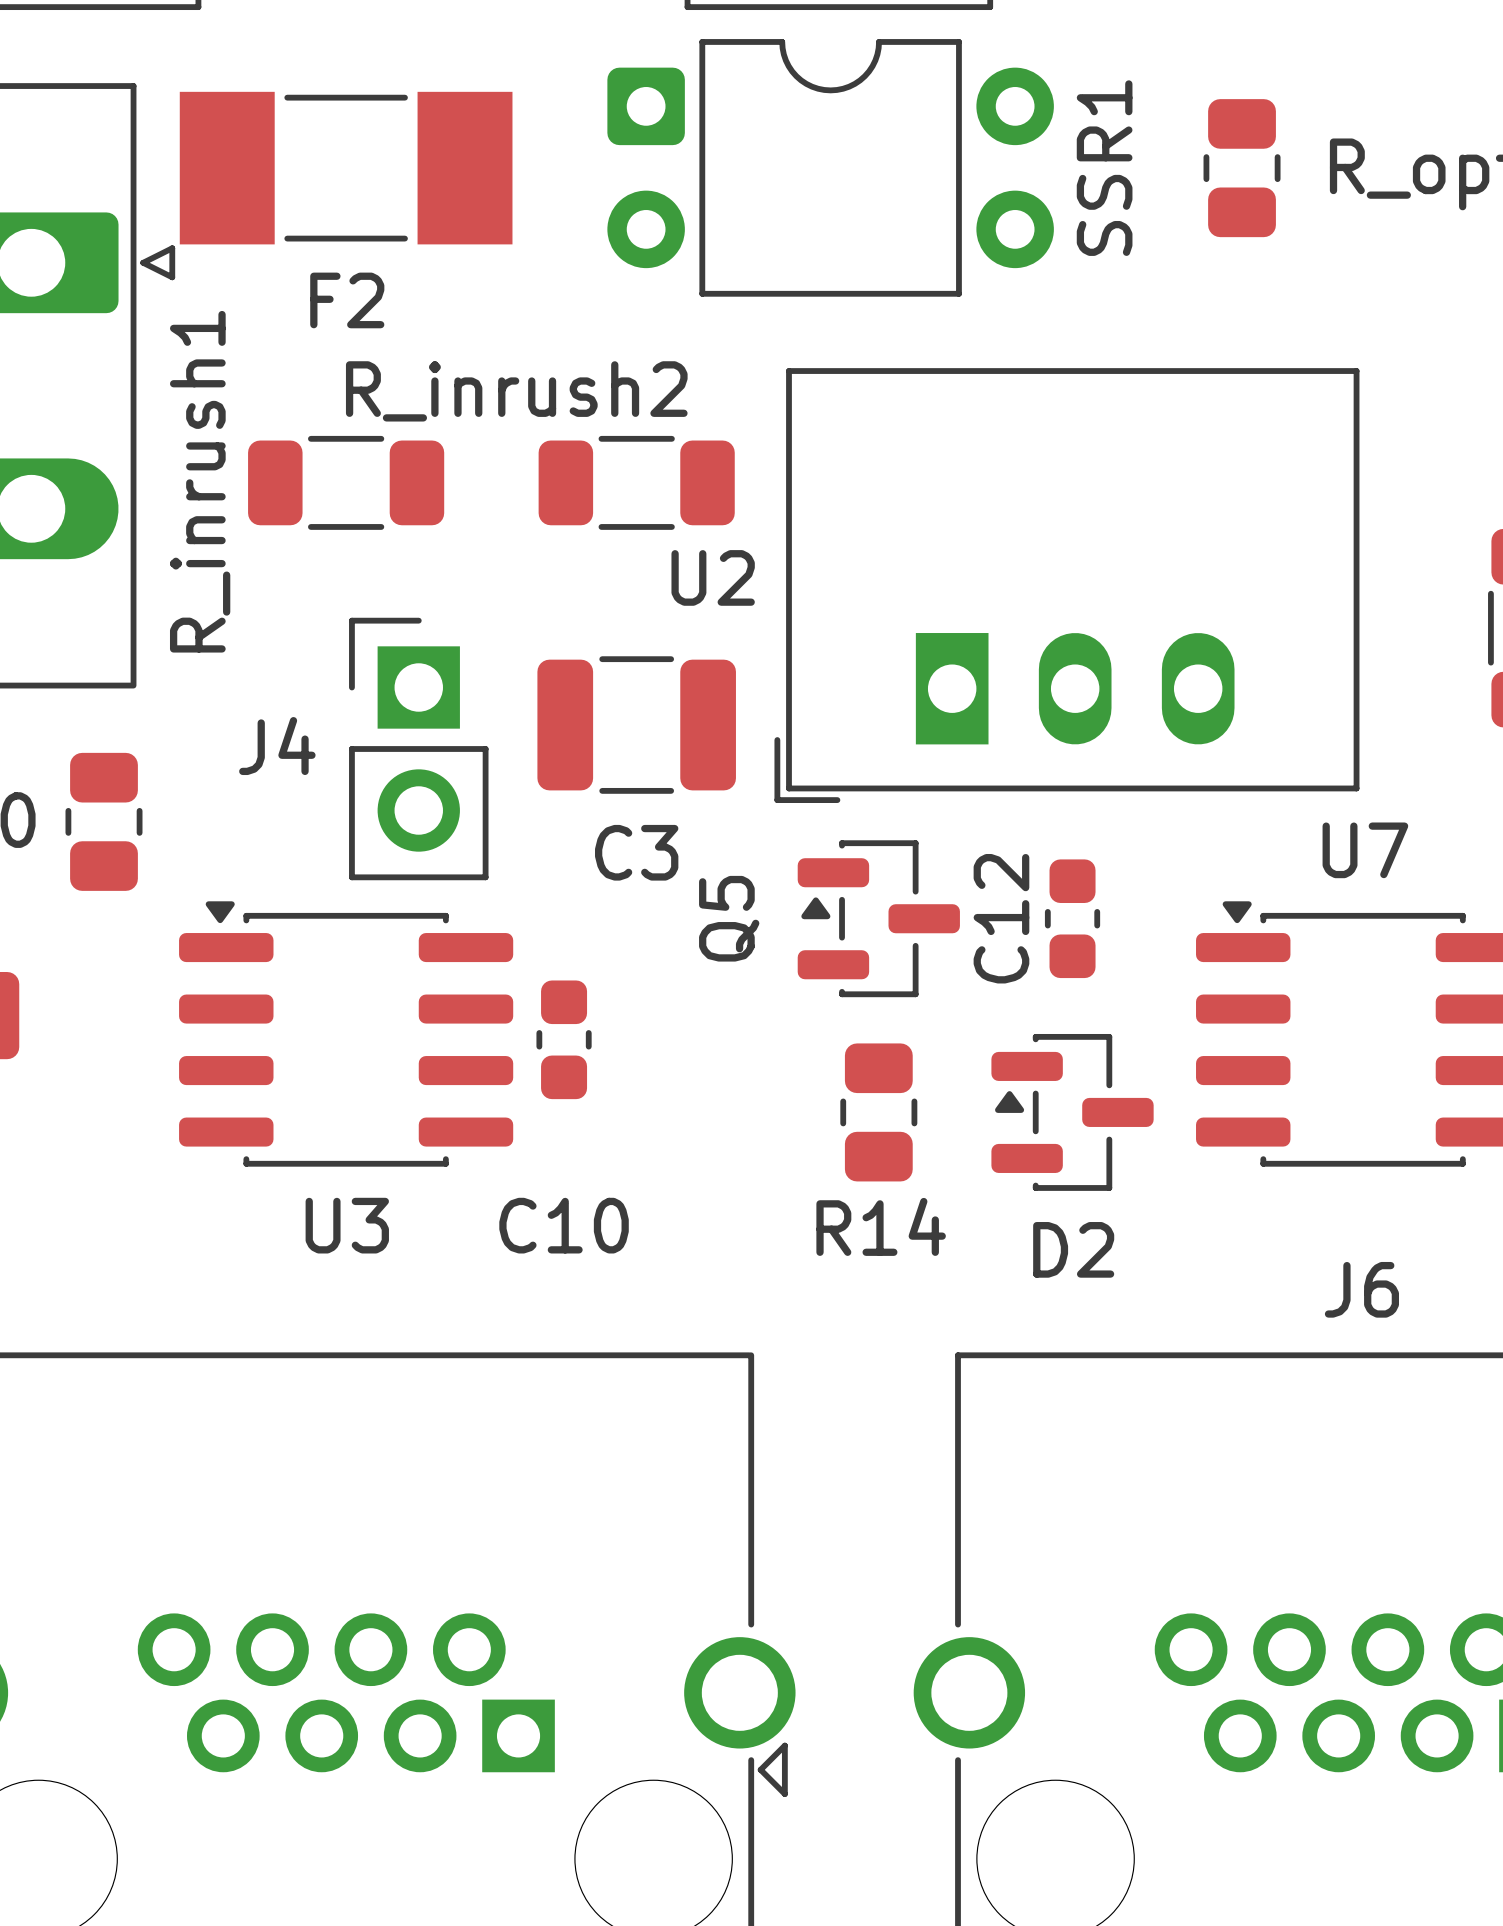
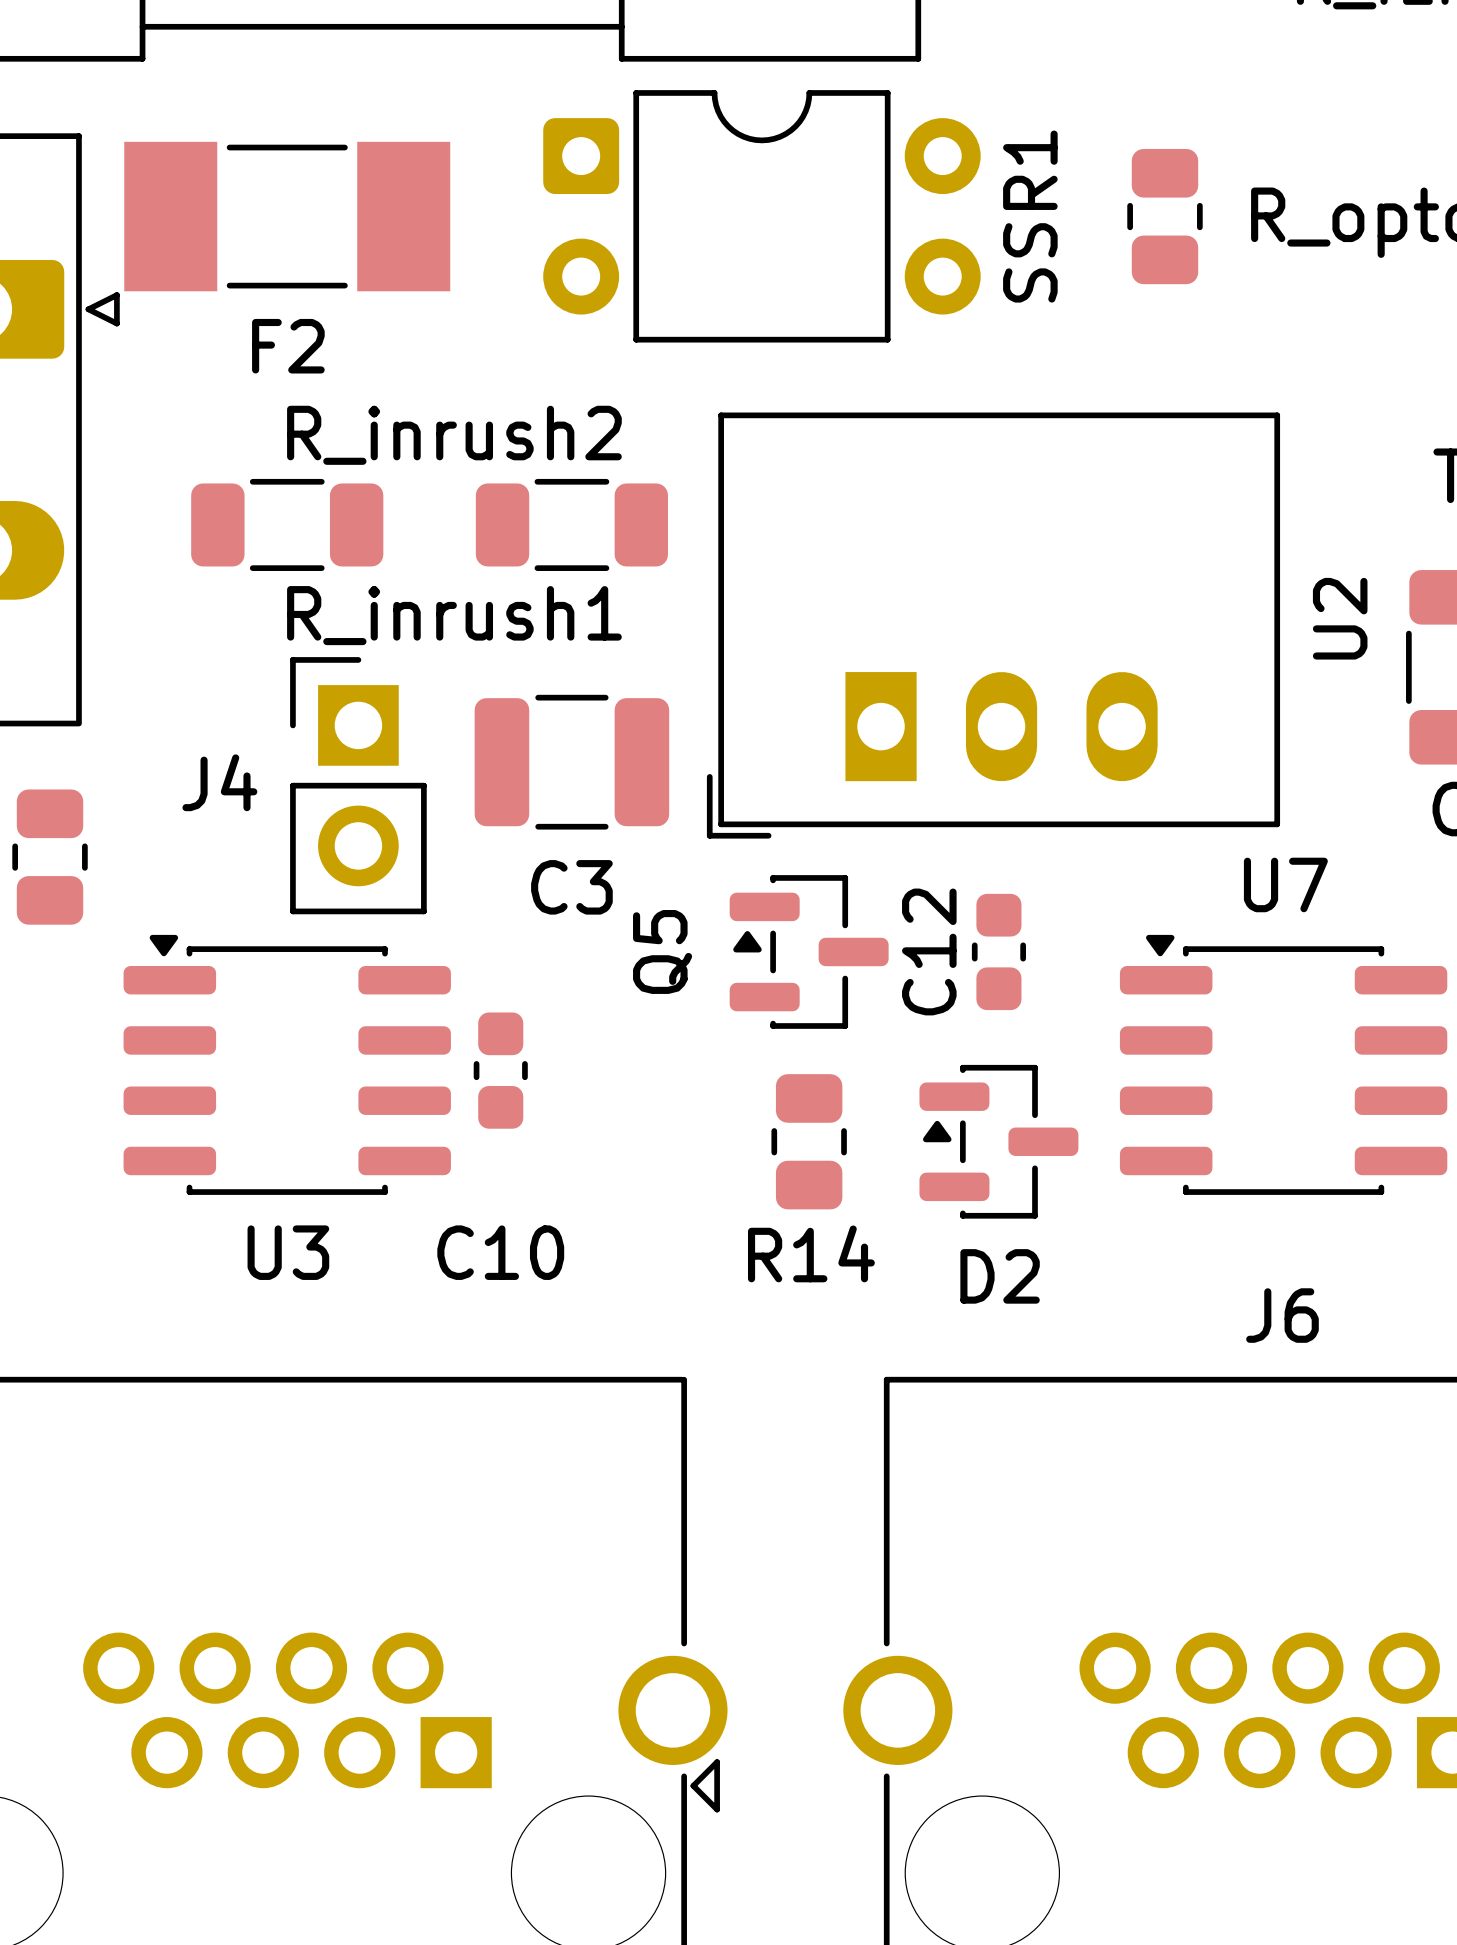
R_inrush1 name rotation: 0° (200, 481) -> 90° clockwise (454, 615)
U2 name rotation: 0° (713, 577) -> 90° counterclockwise (1340, 618)
U2 name position: U2 (713, 577) -> U2 (1340, 618)

